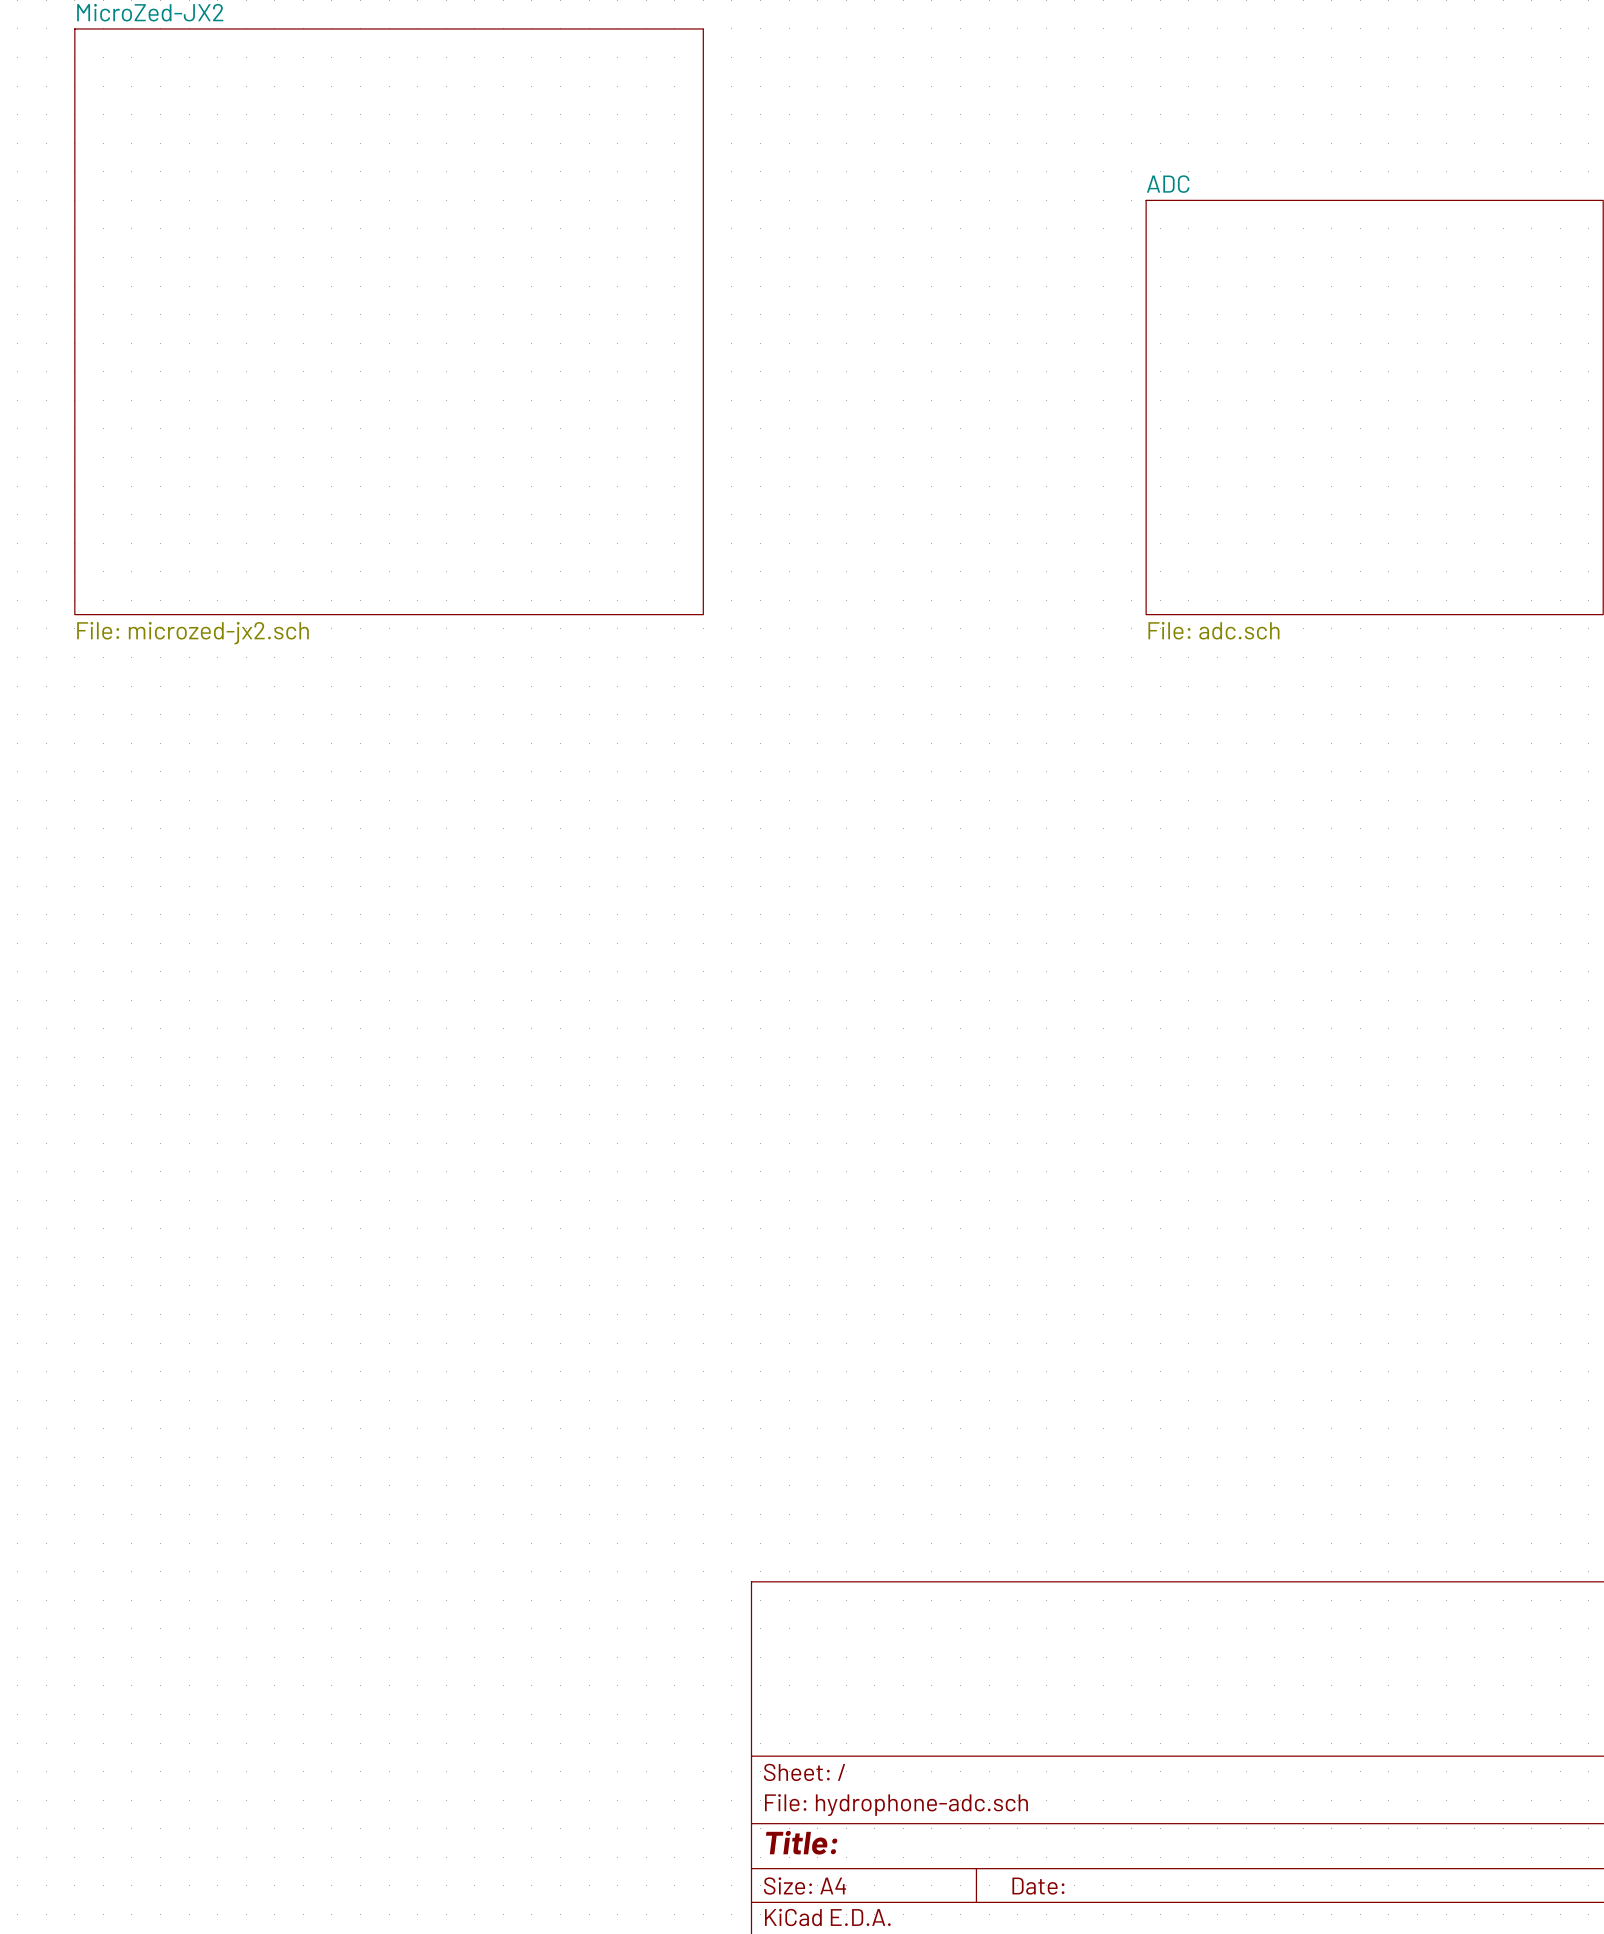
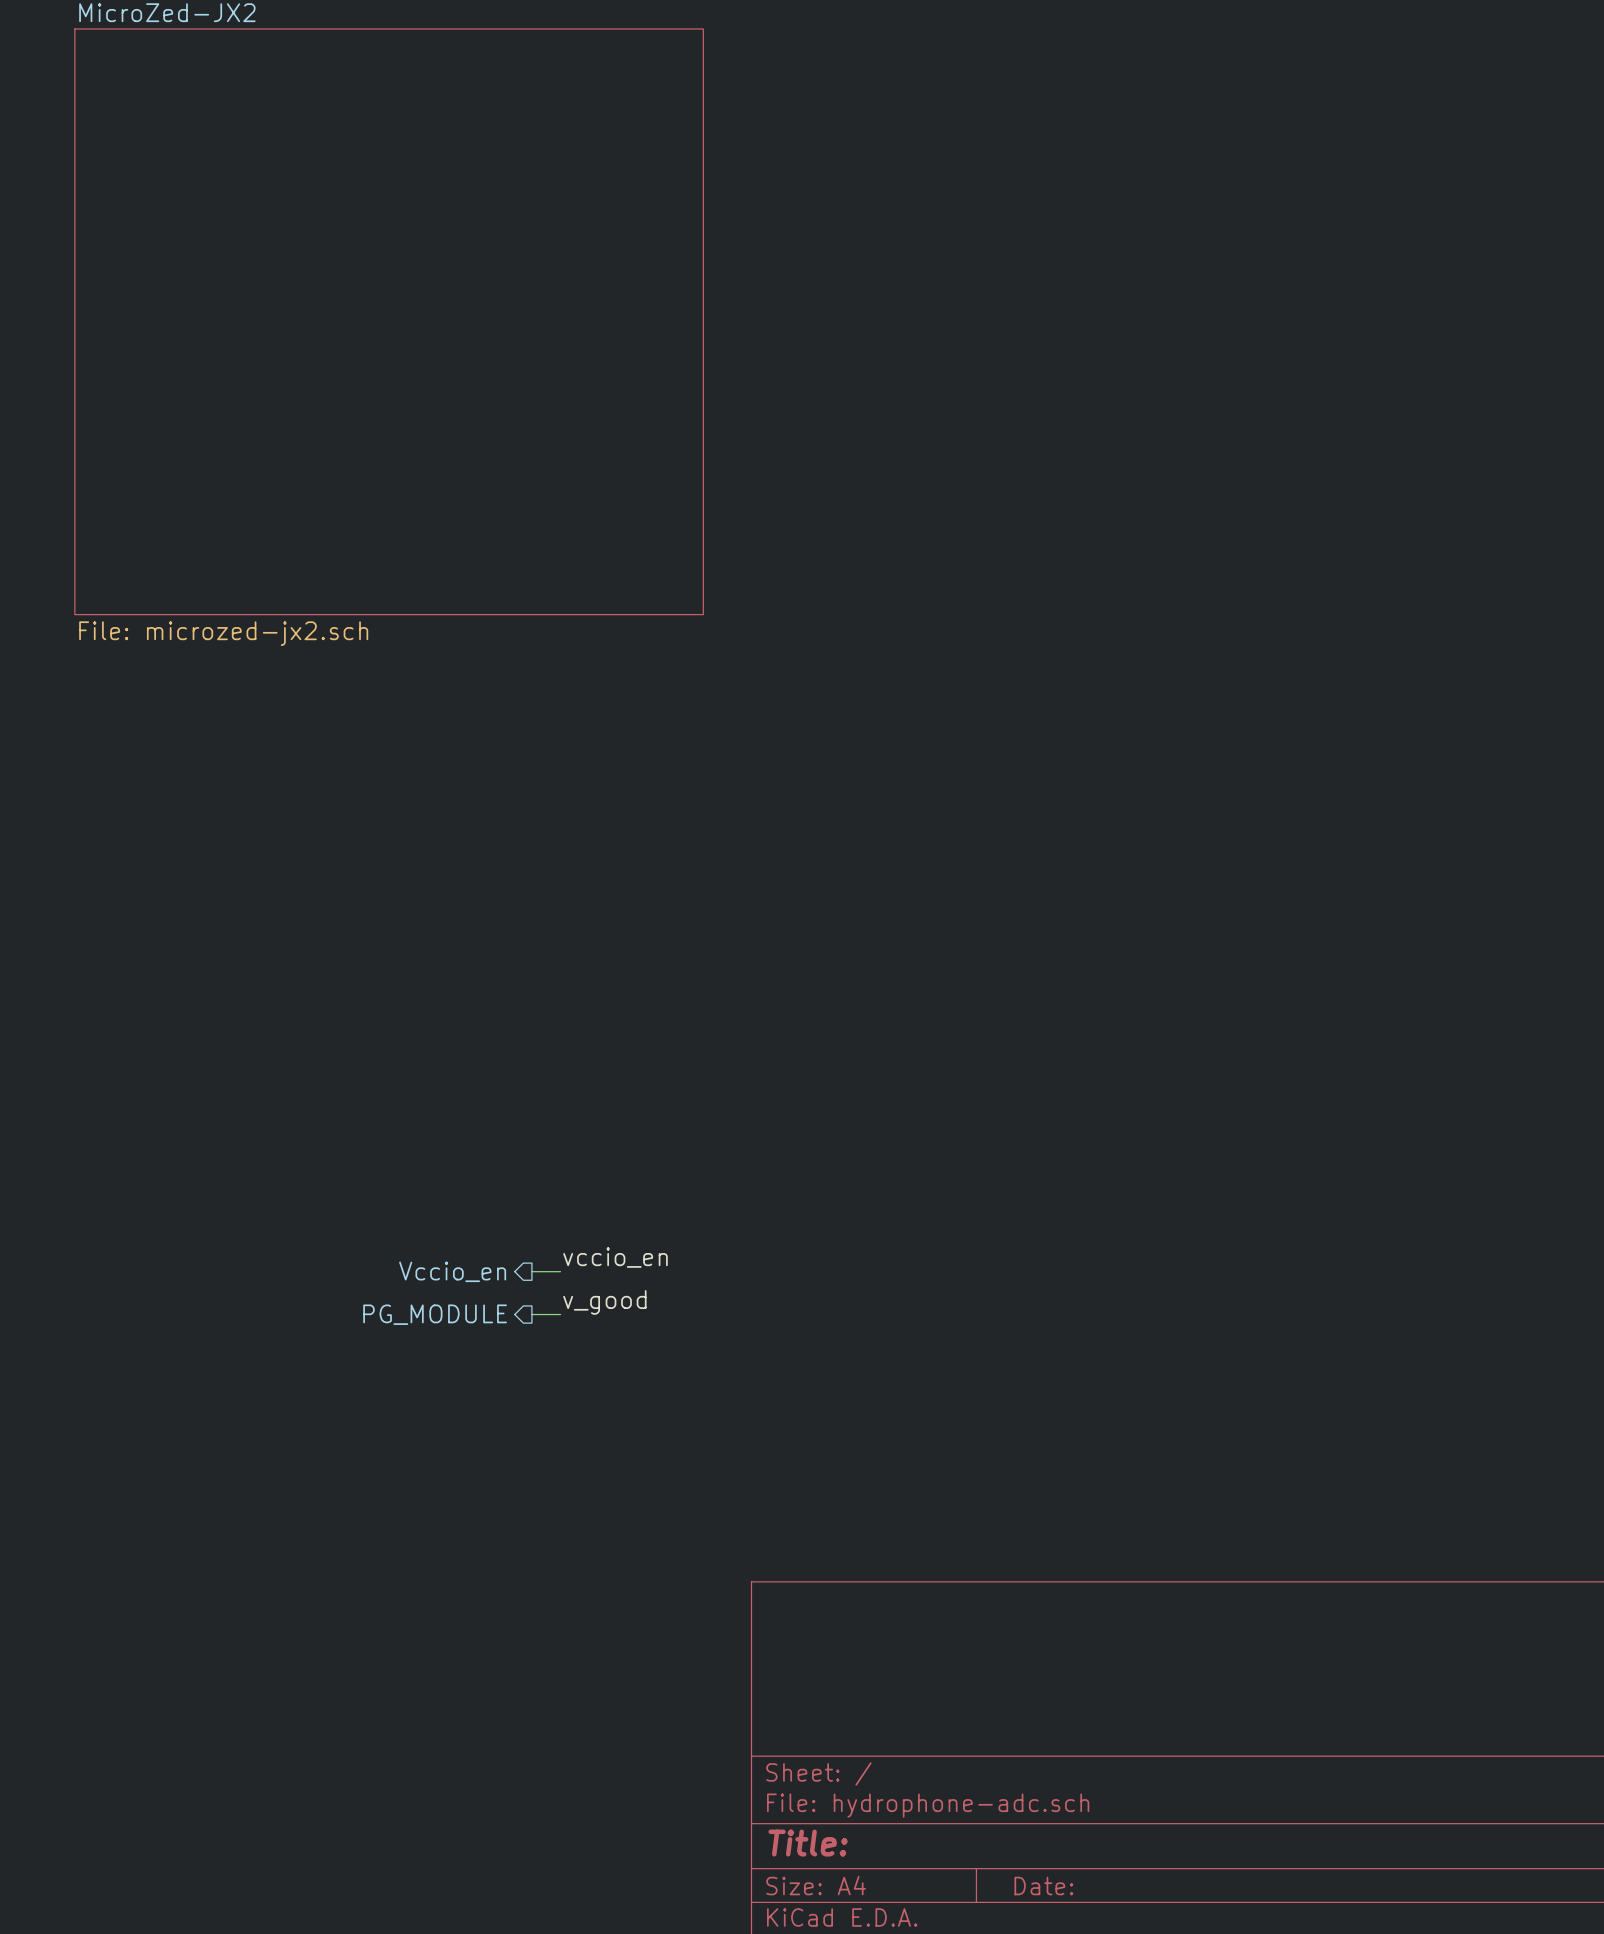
sheet ADC: File: adc.sch (1374, 407) -> none
label: none -> vccio_en (615, 1257)
sheet pin: none -> Vccio_en (452, 1271)
wire: none -> (531, 1271) (560, 1271)
label: none -> v_good (604, 1302)
sheet pin: none -> PG_MODULE (435, 1314)
wire: none -> (531, 1314) (560, 1314)

